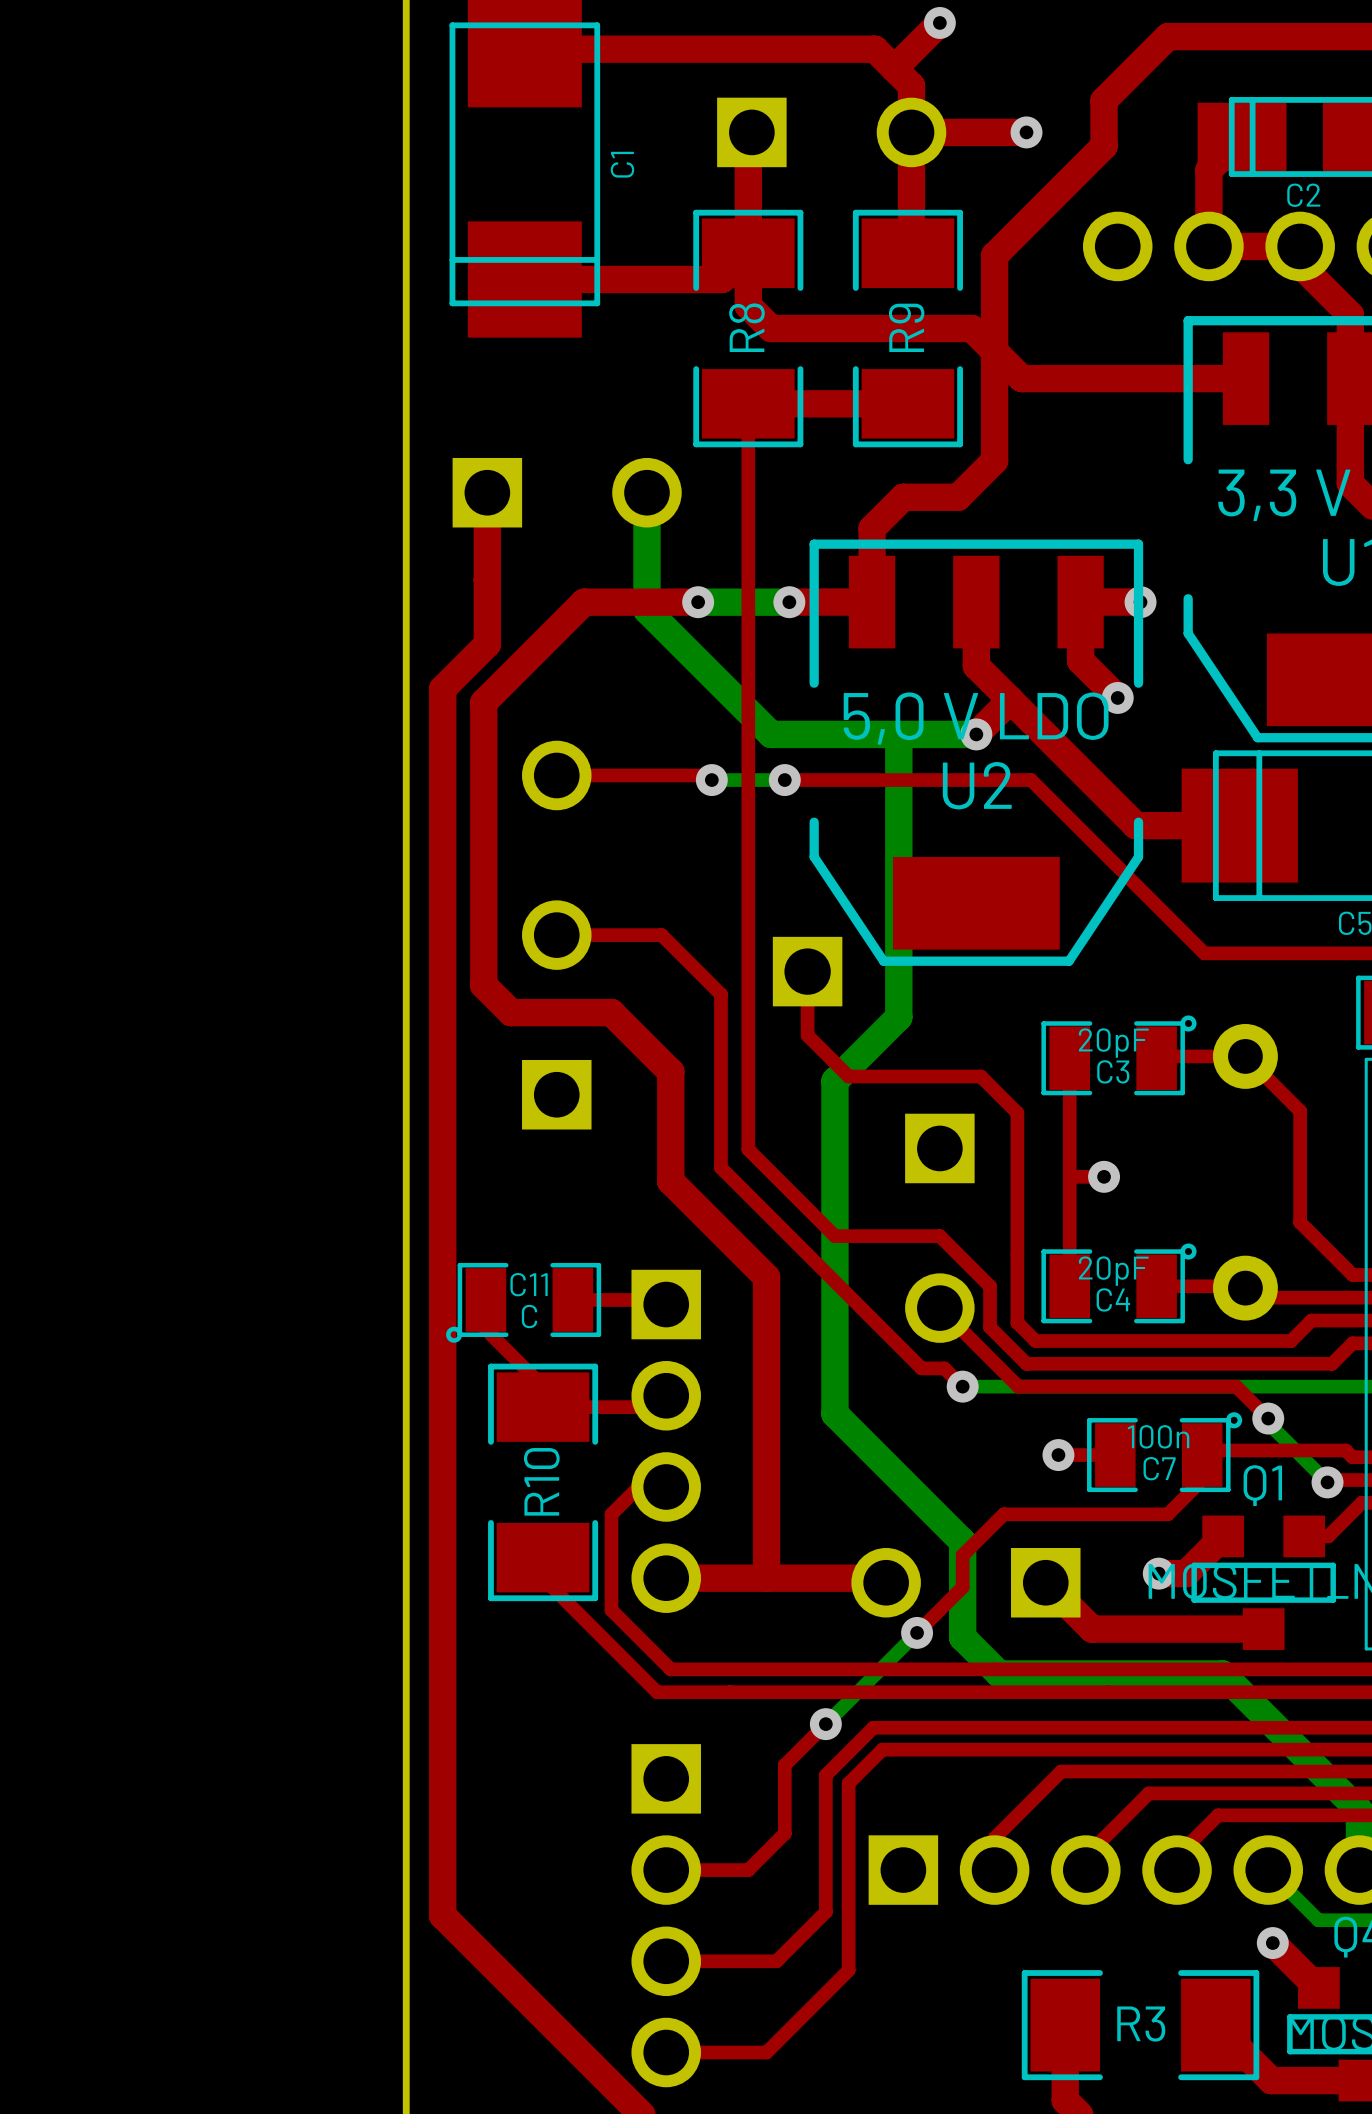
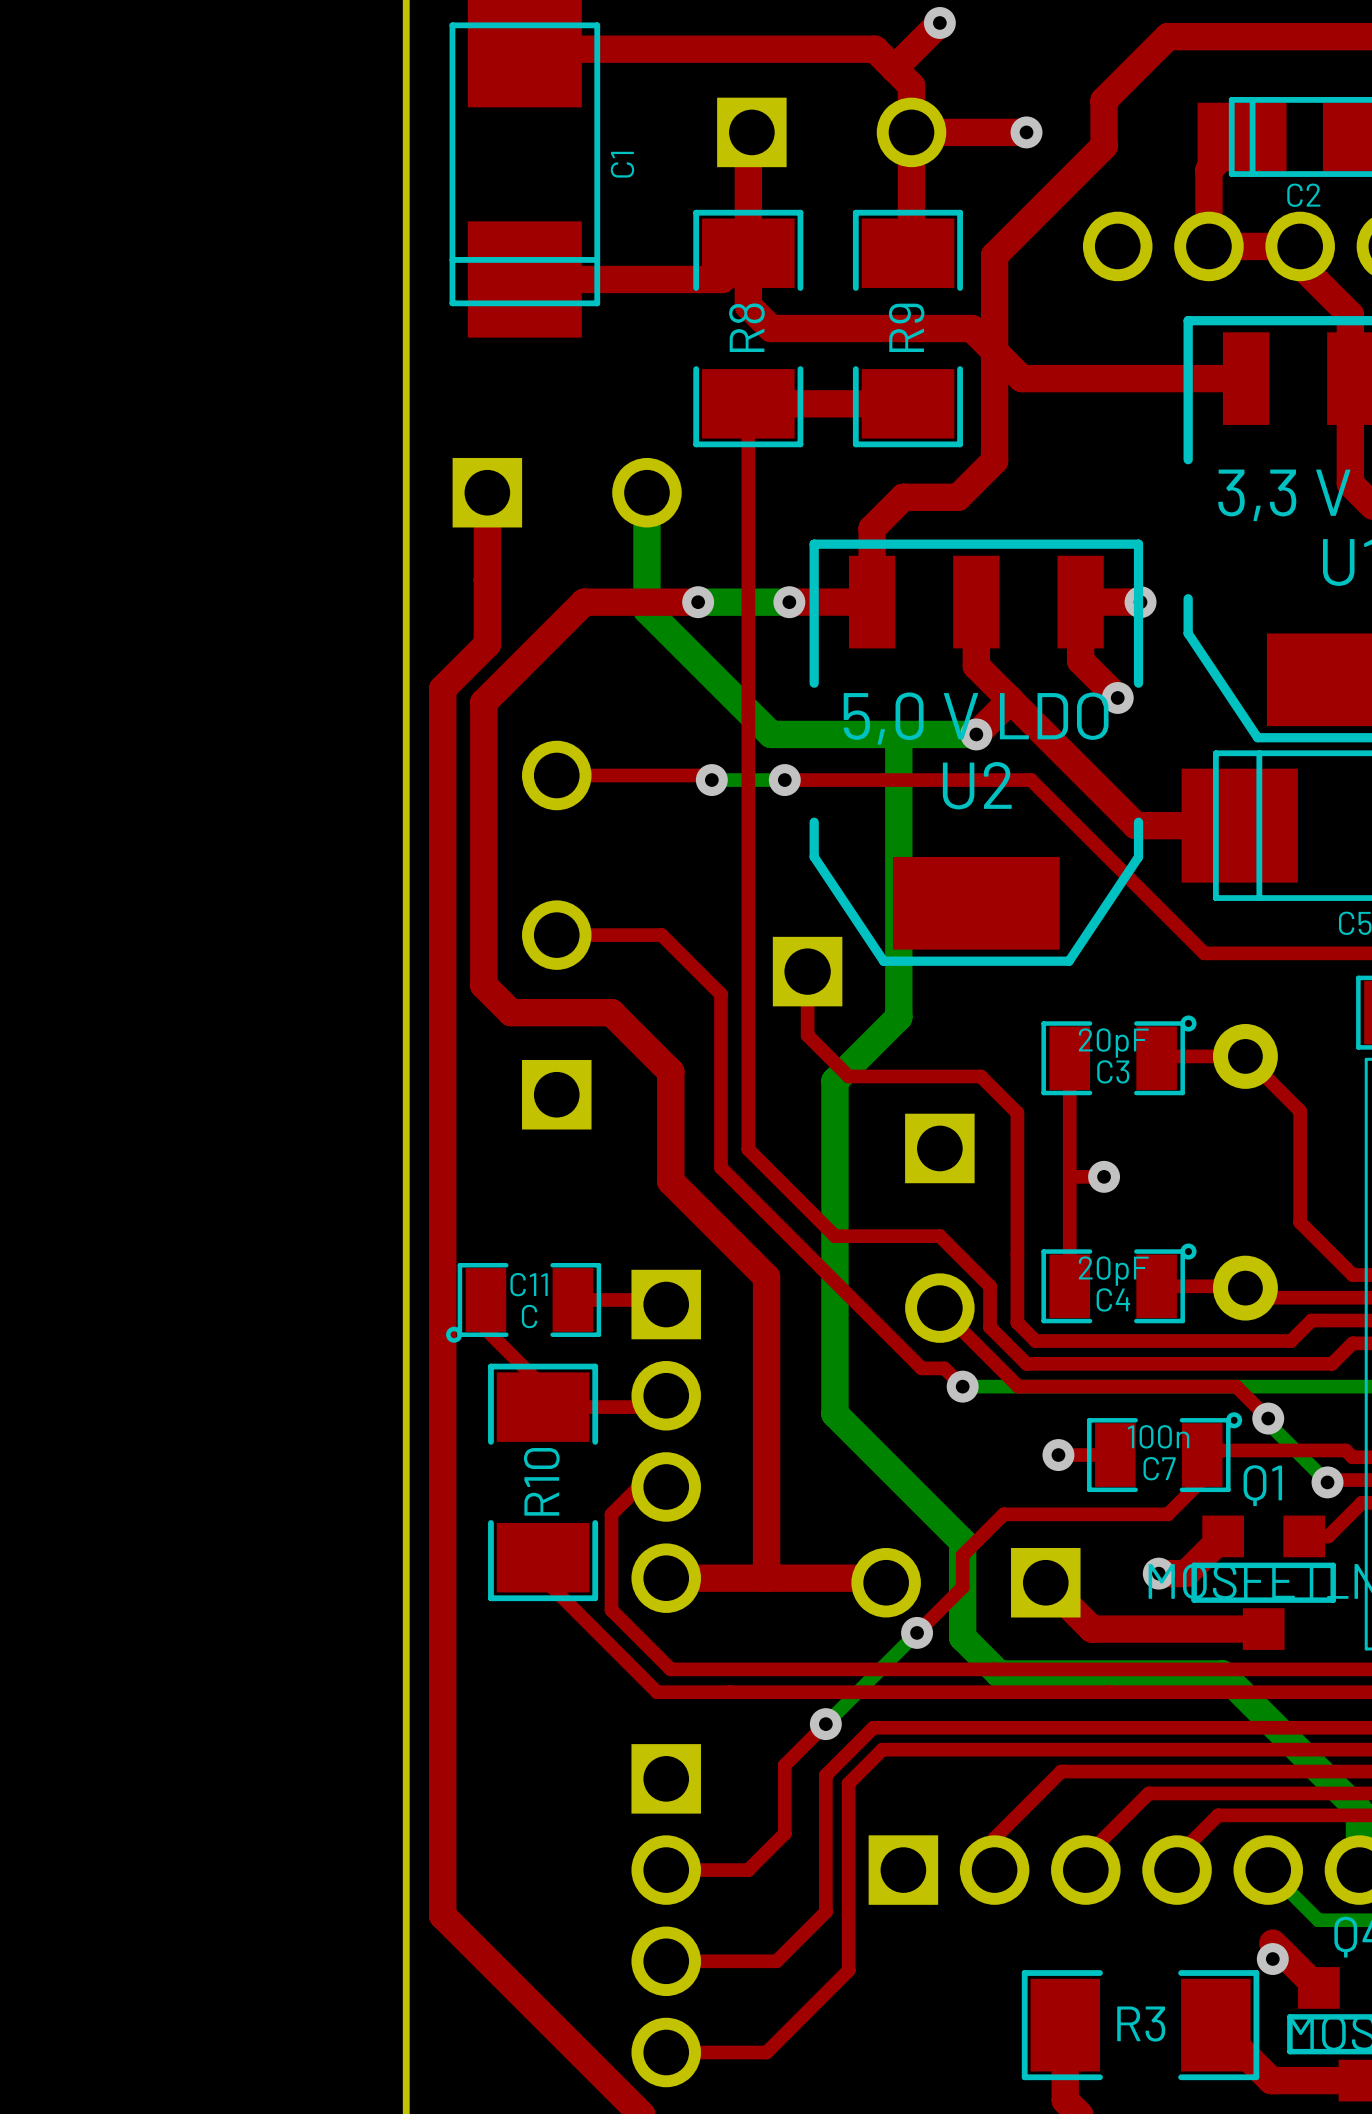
via position: (1272, 1943) -> (1272, 1959)

